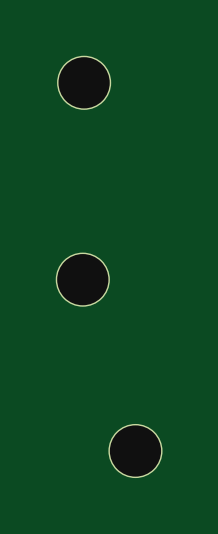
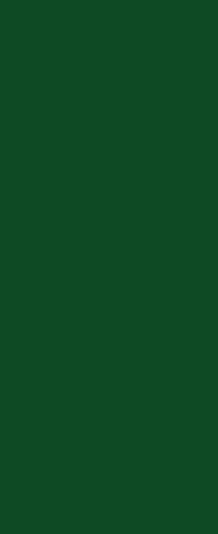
part: (84, 82) -> none
part: (82, 279) -> none
part: (135, 451) -> none

